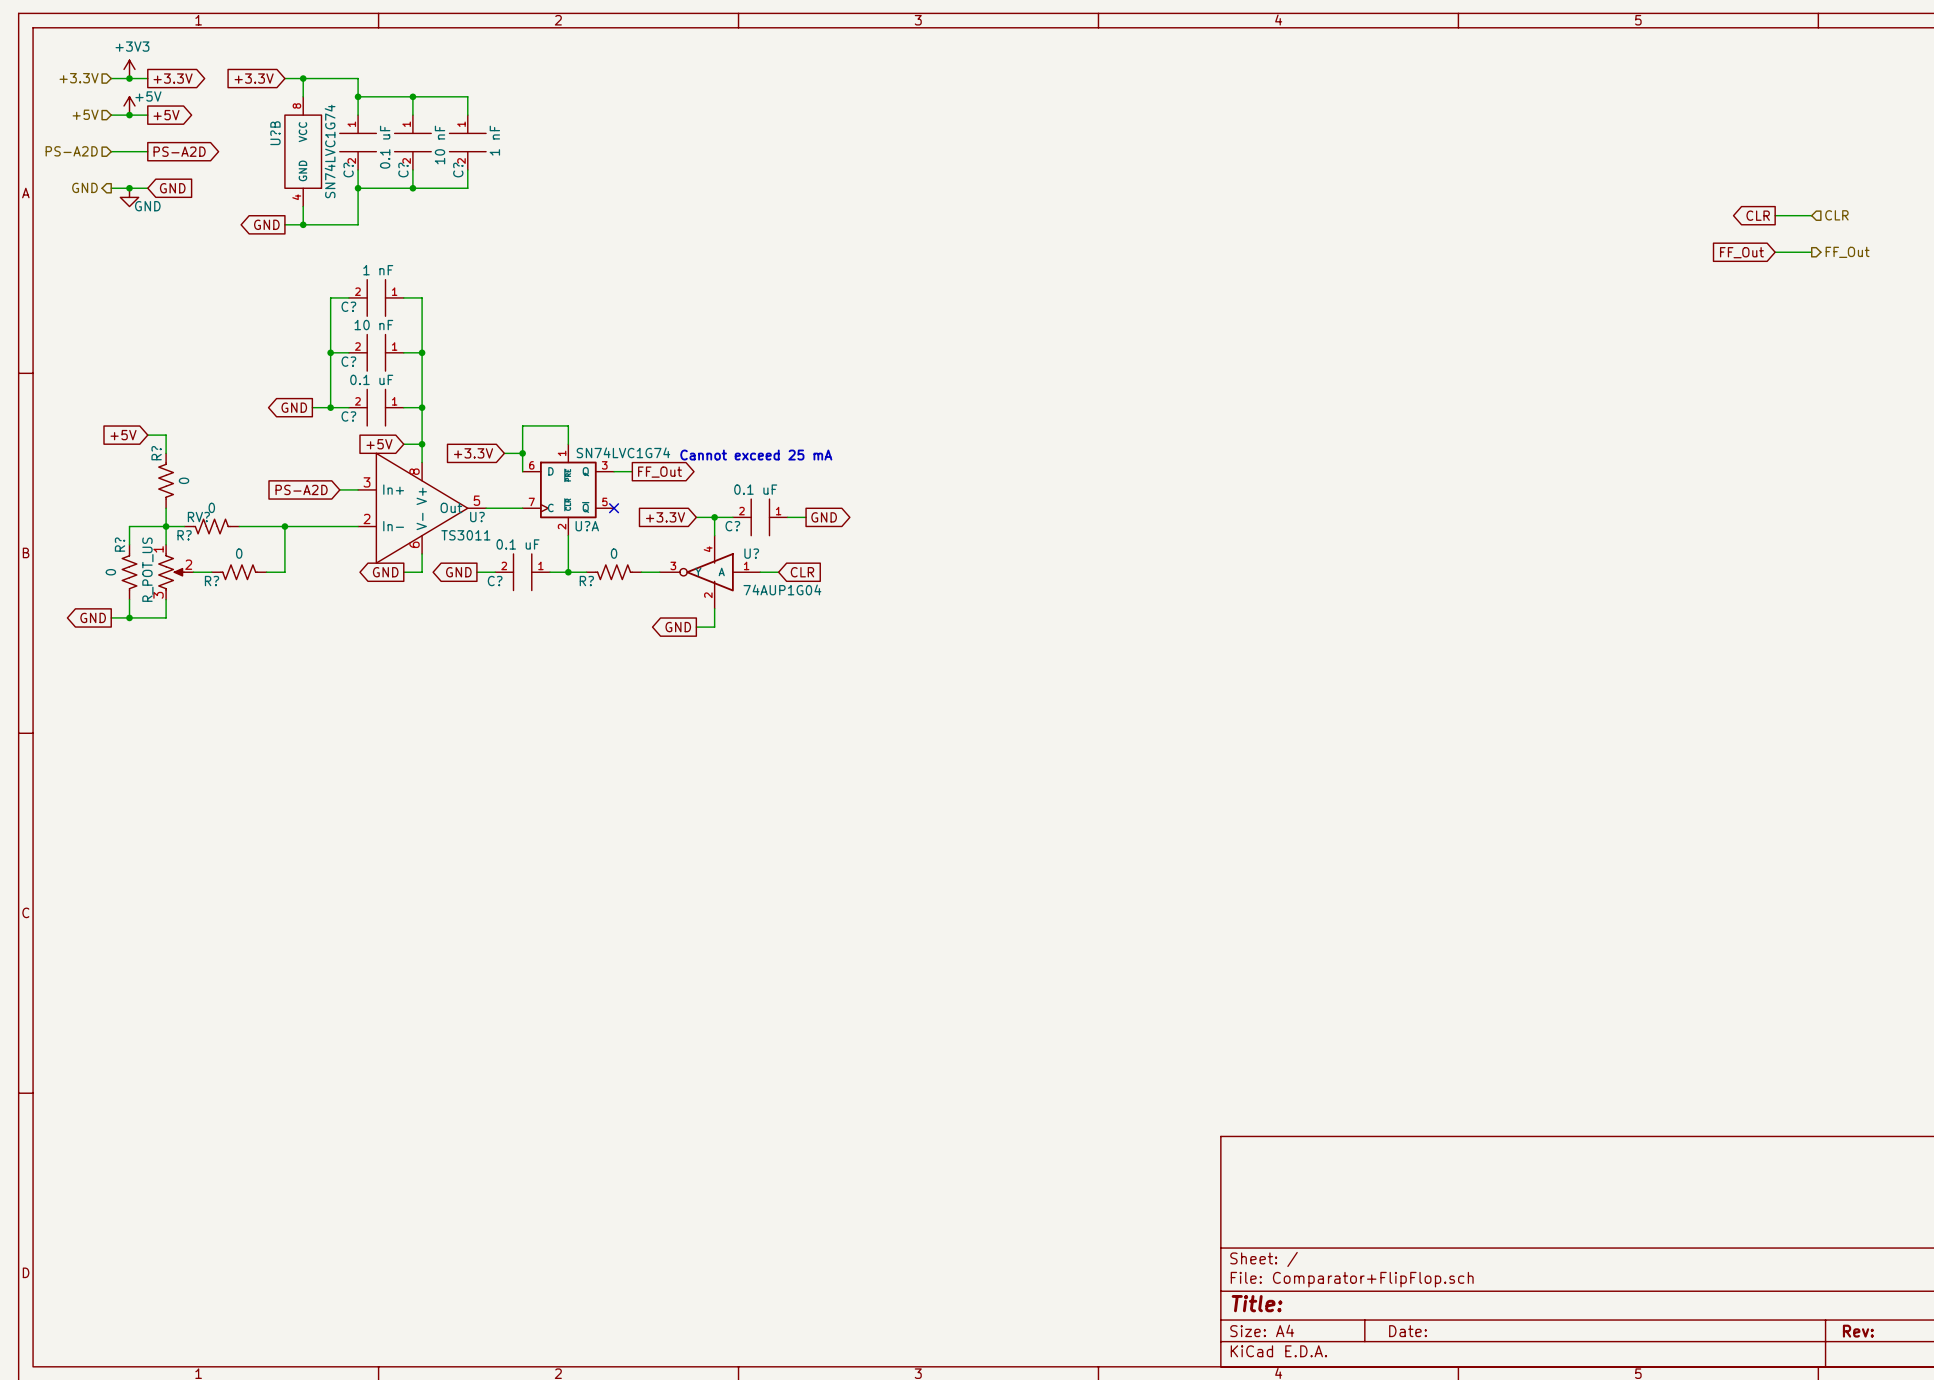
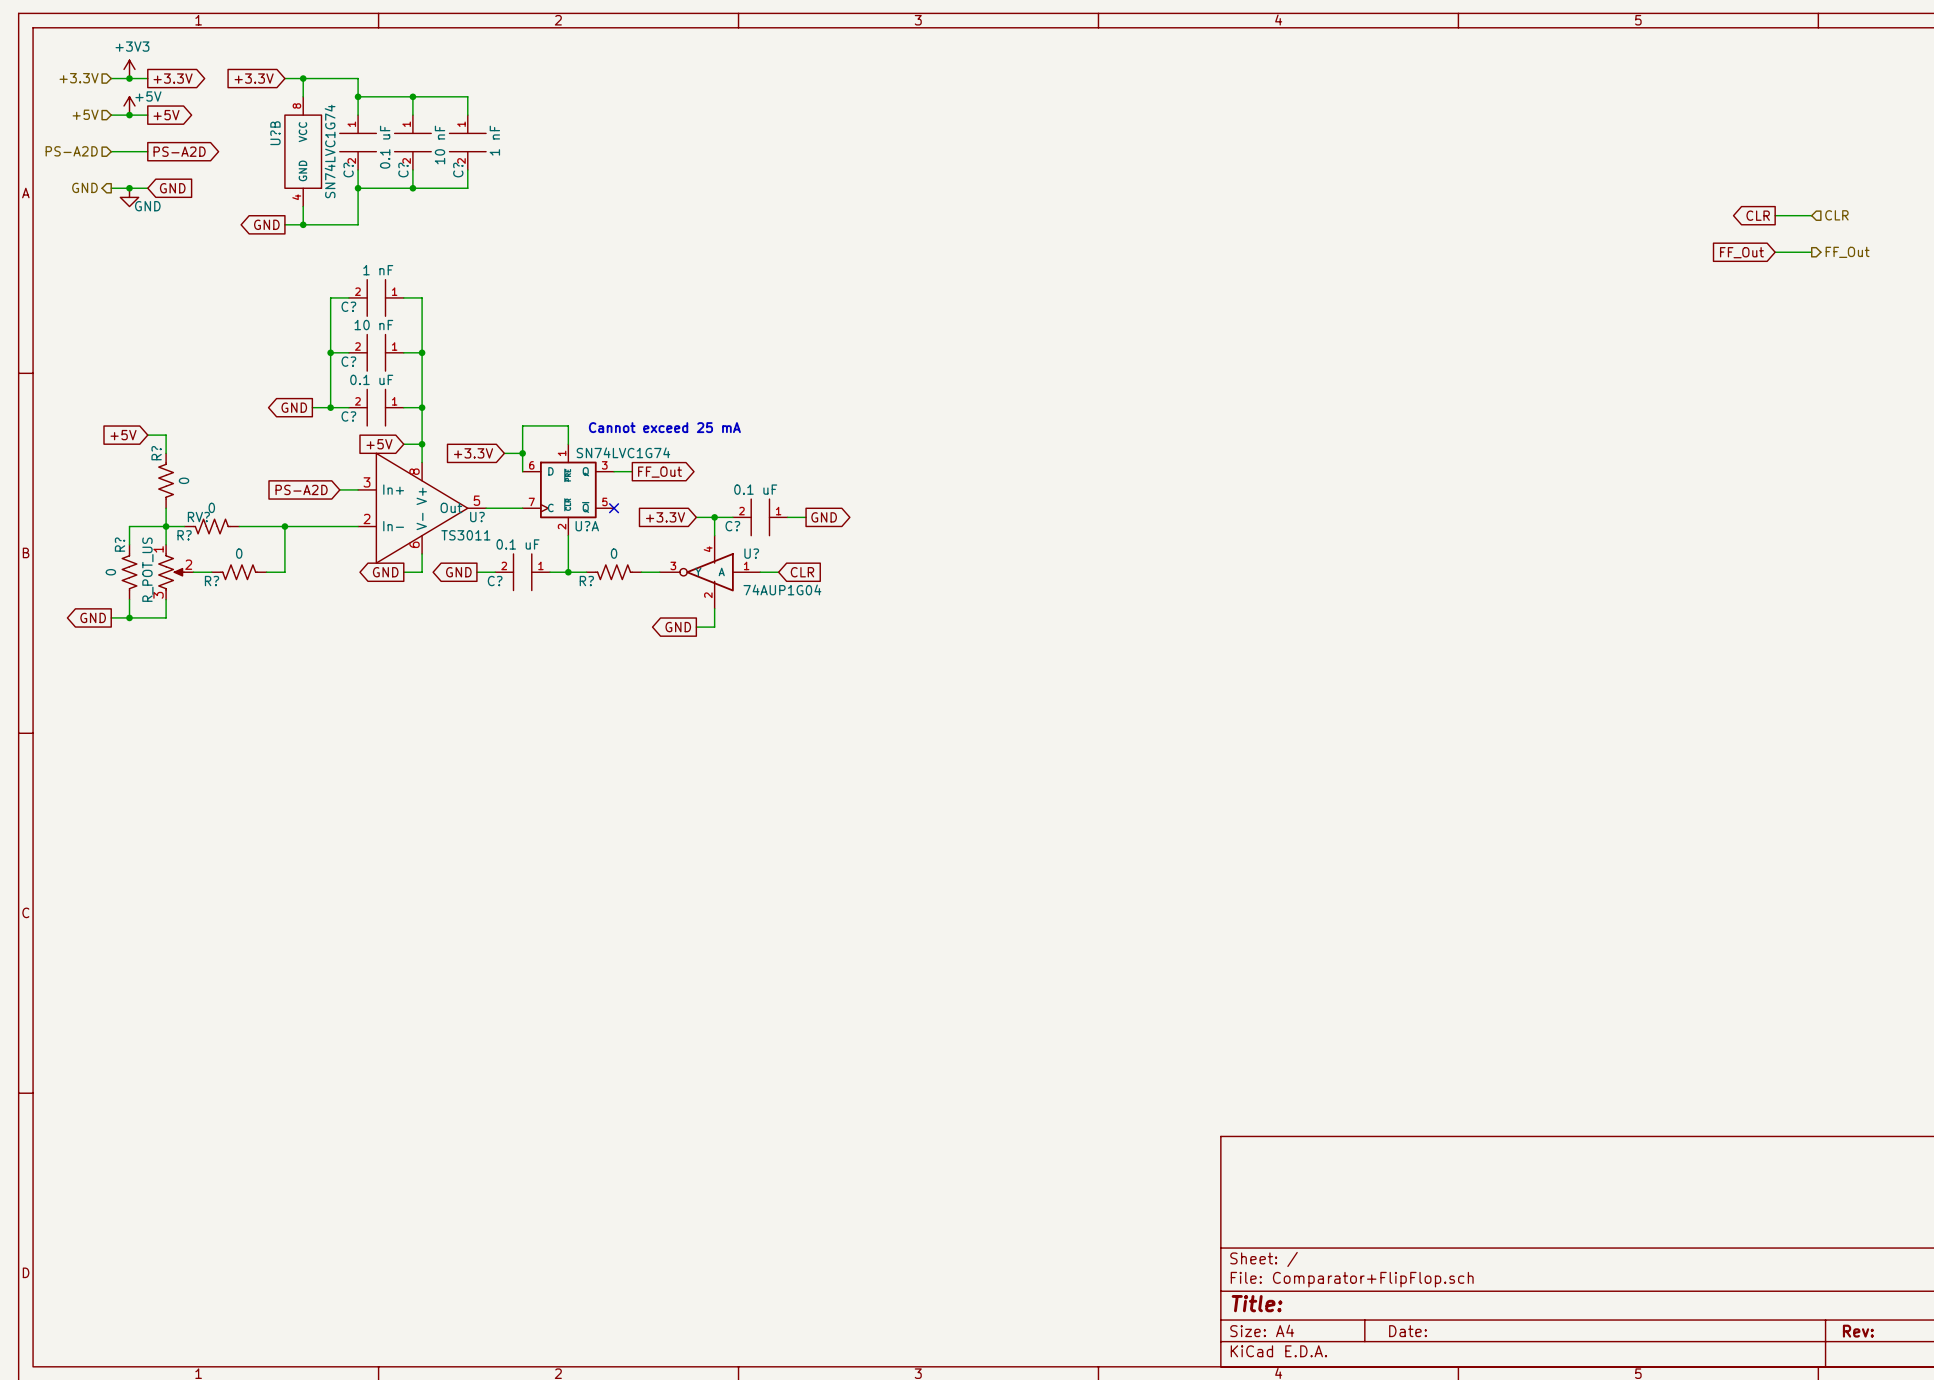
text position: Cannot exceed 25 mA (756, 455) -> Cannot exceed 25 mA (664, 427)

